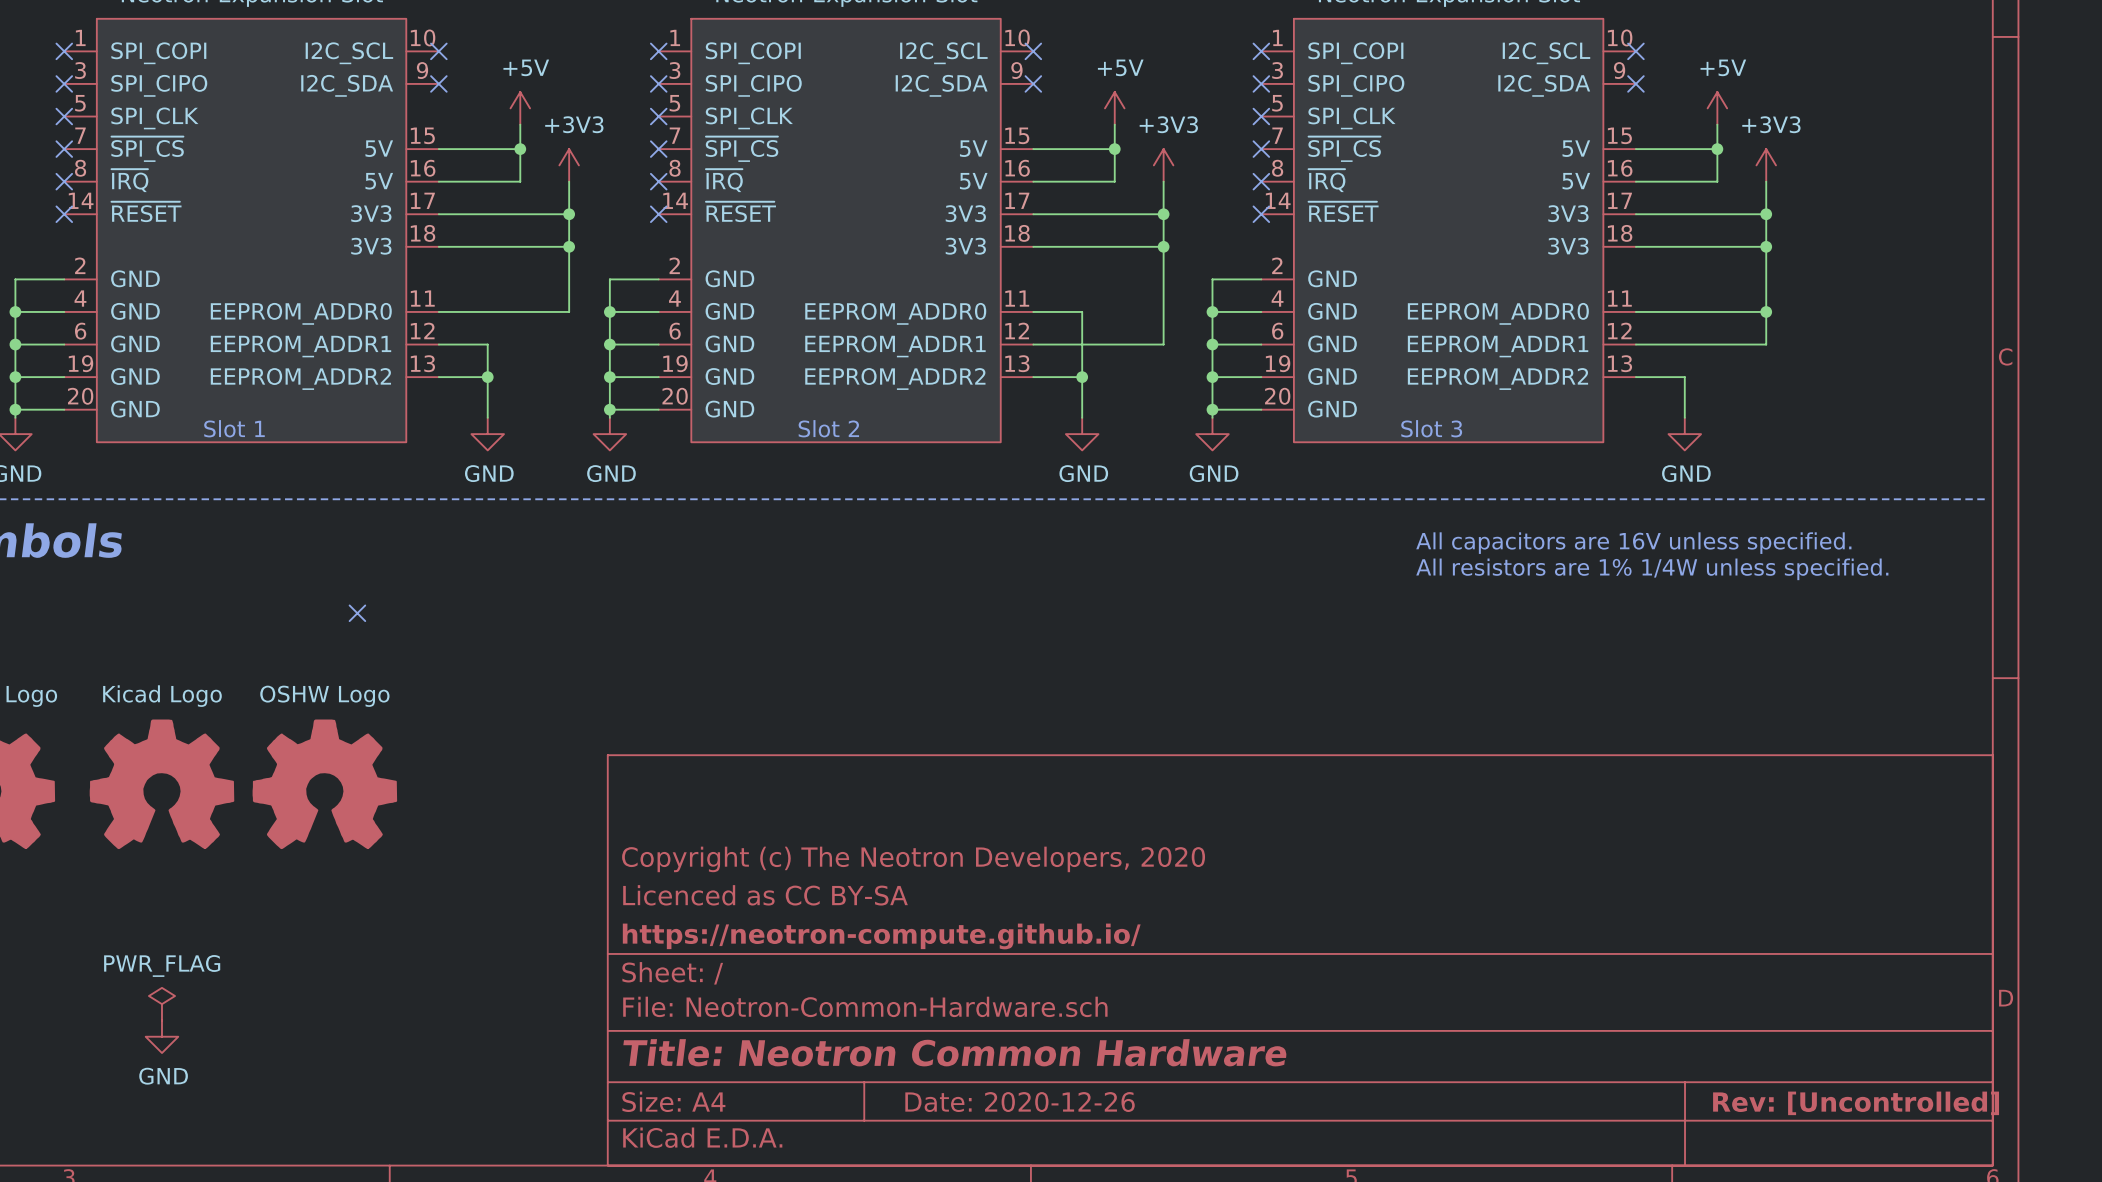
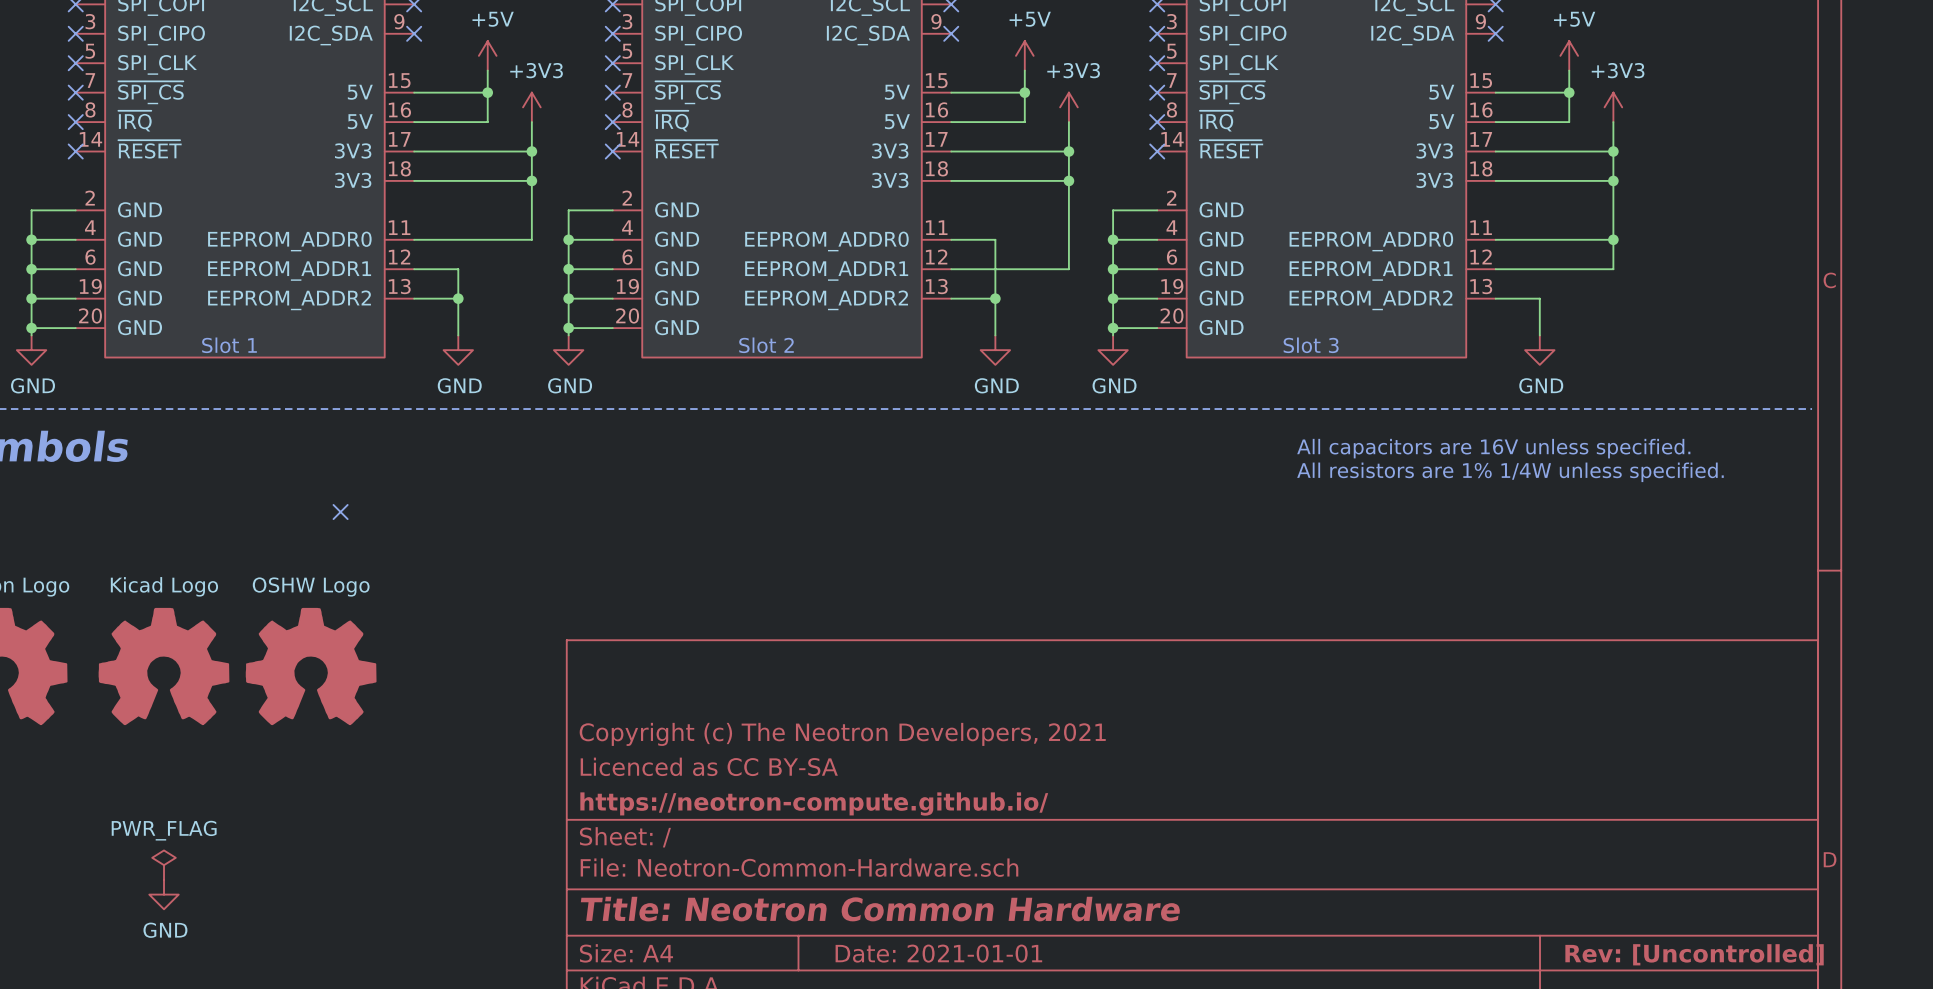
title block: Copyright (c) The Neotron Developers, 2020 (913, 859) -> Copyright (c) The Neotron Developers, 2021 (842, 734)
title block: Date: 2020-12-26 (1020, 1102) -> Date: 2021-01-01 (938, 953)

